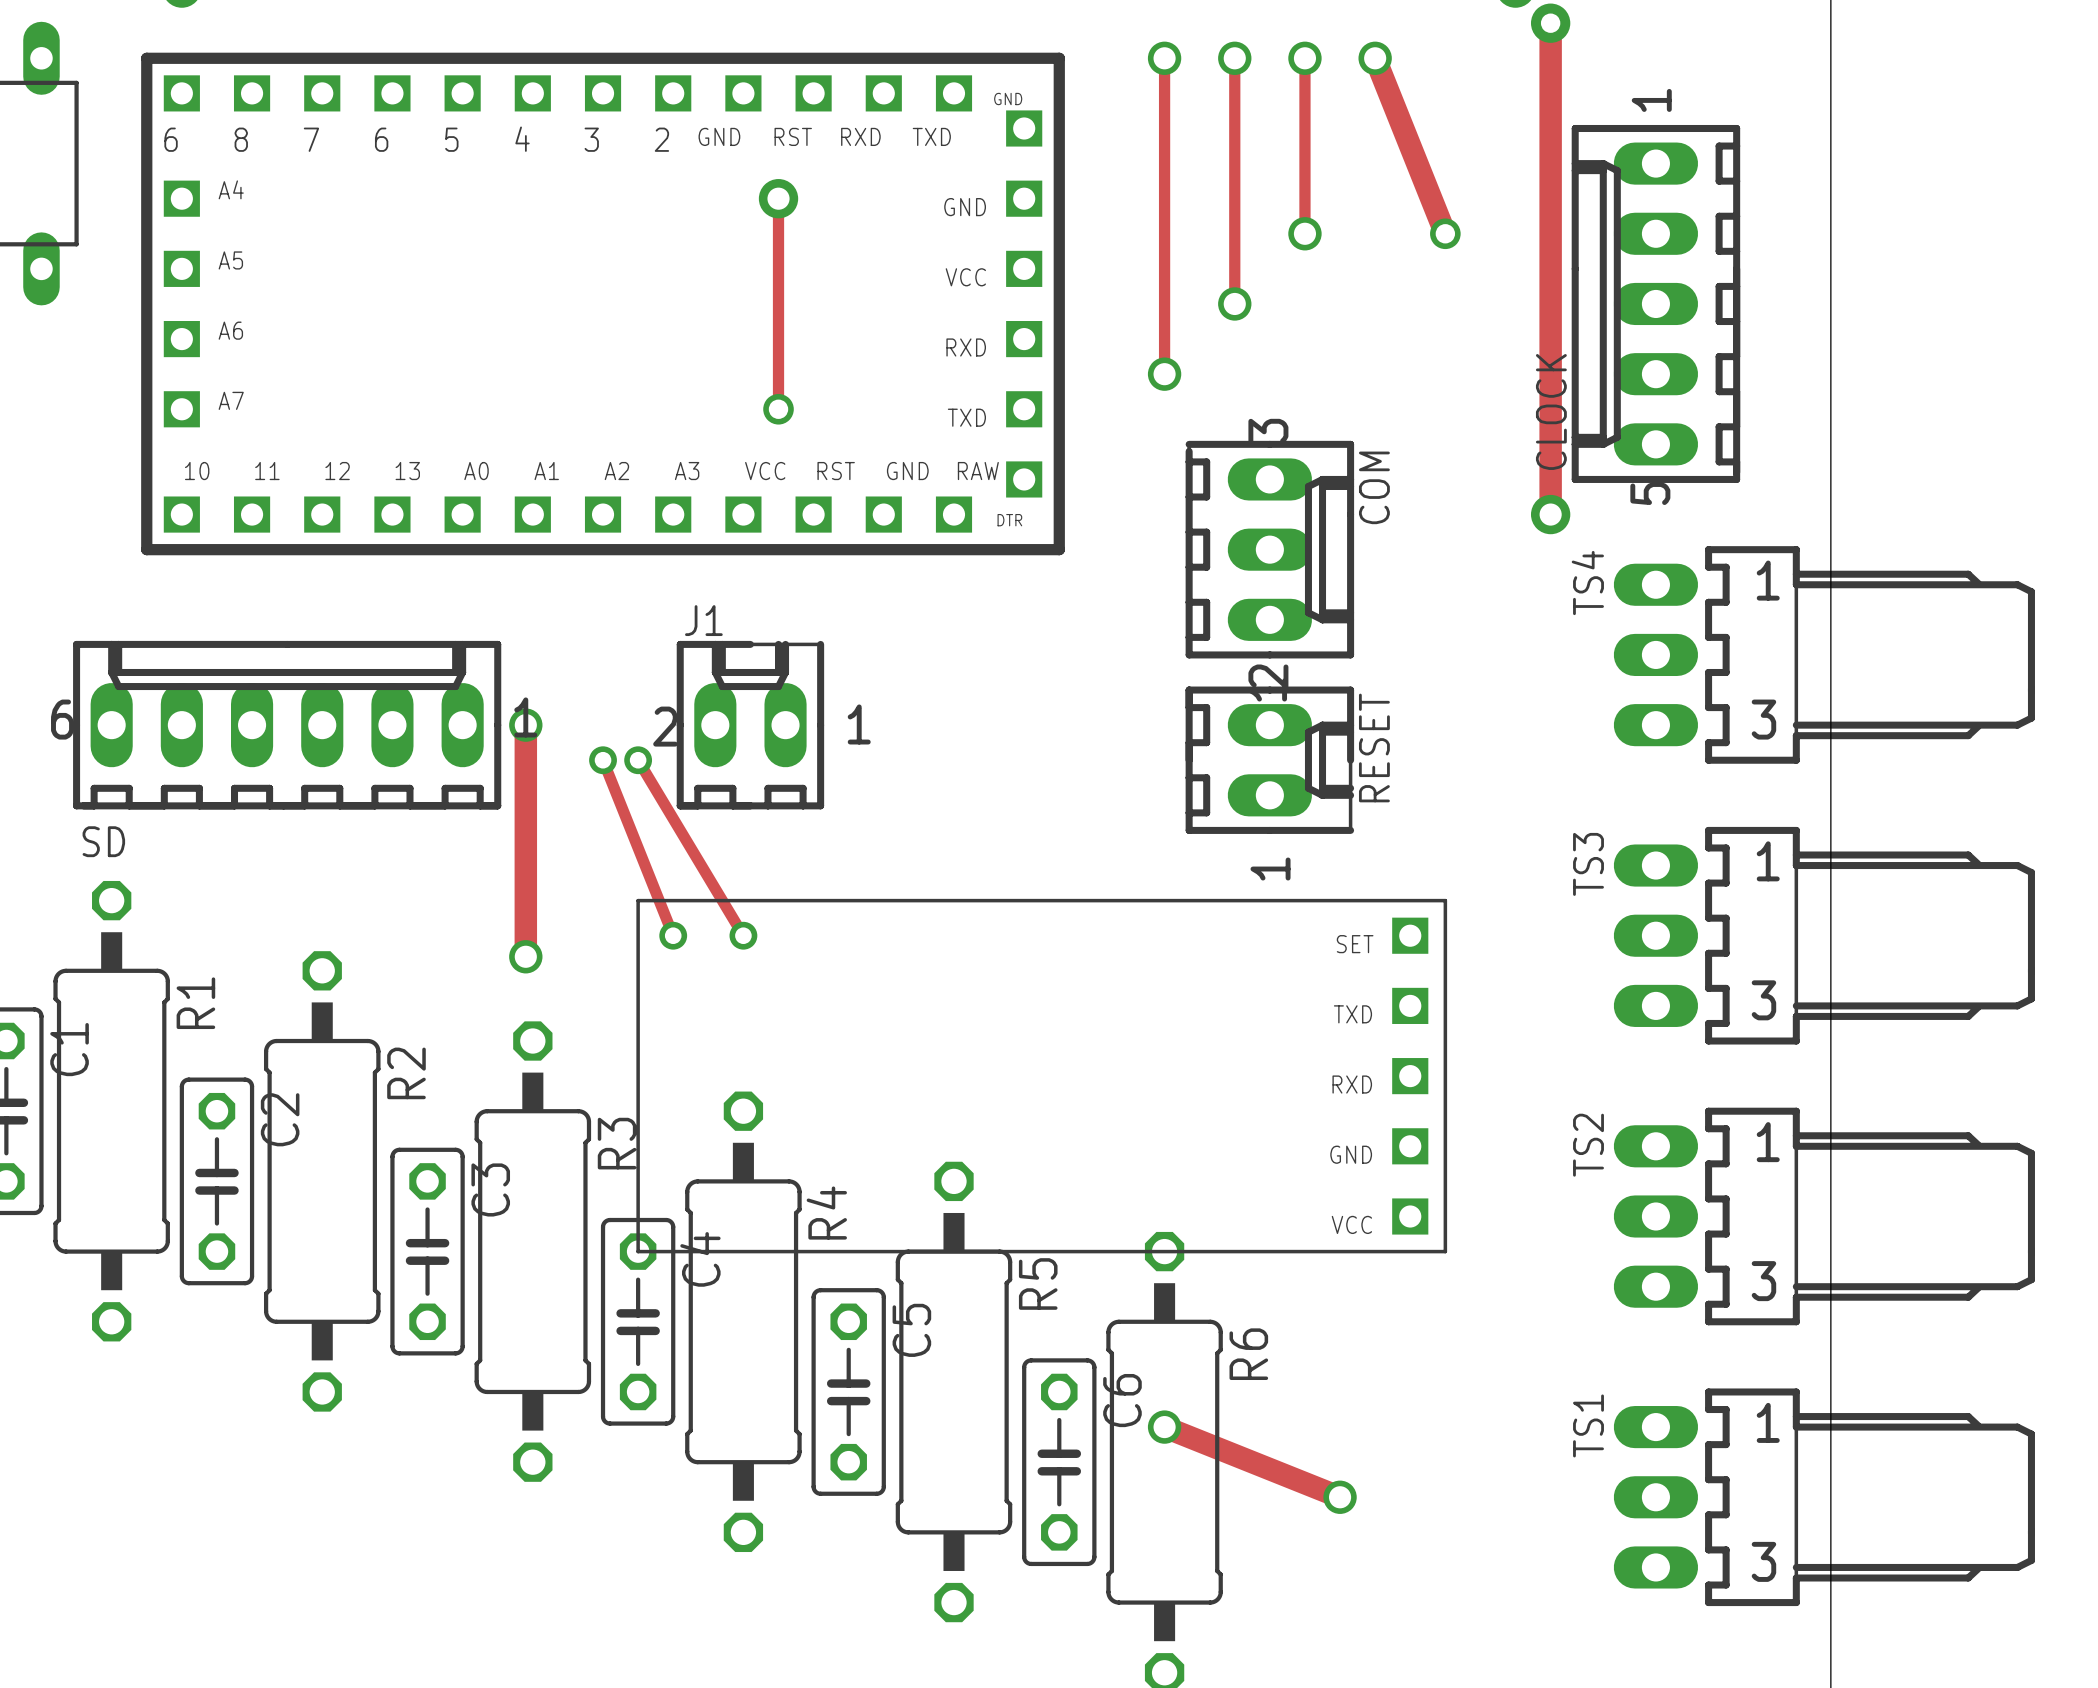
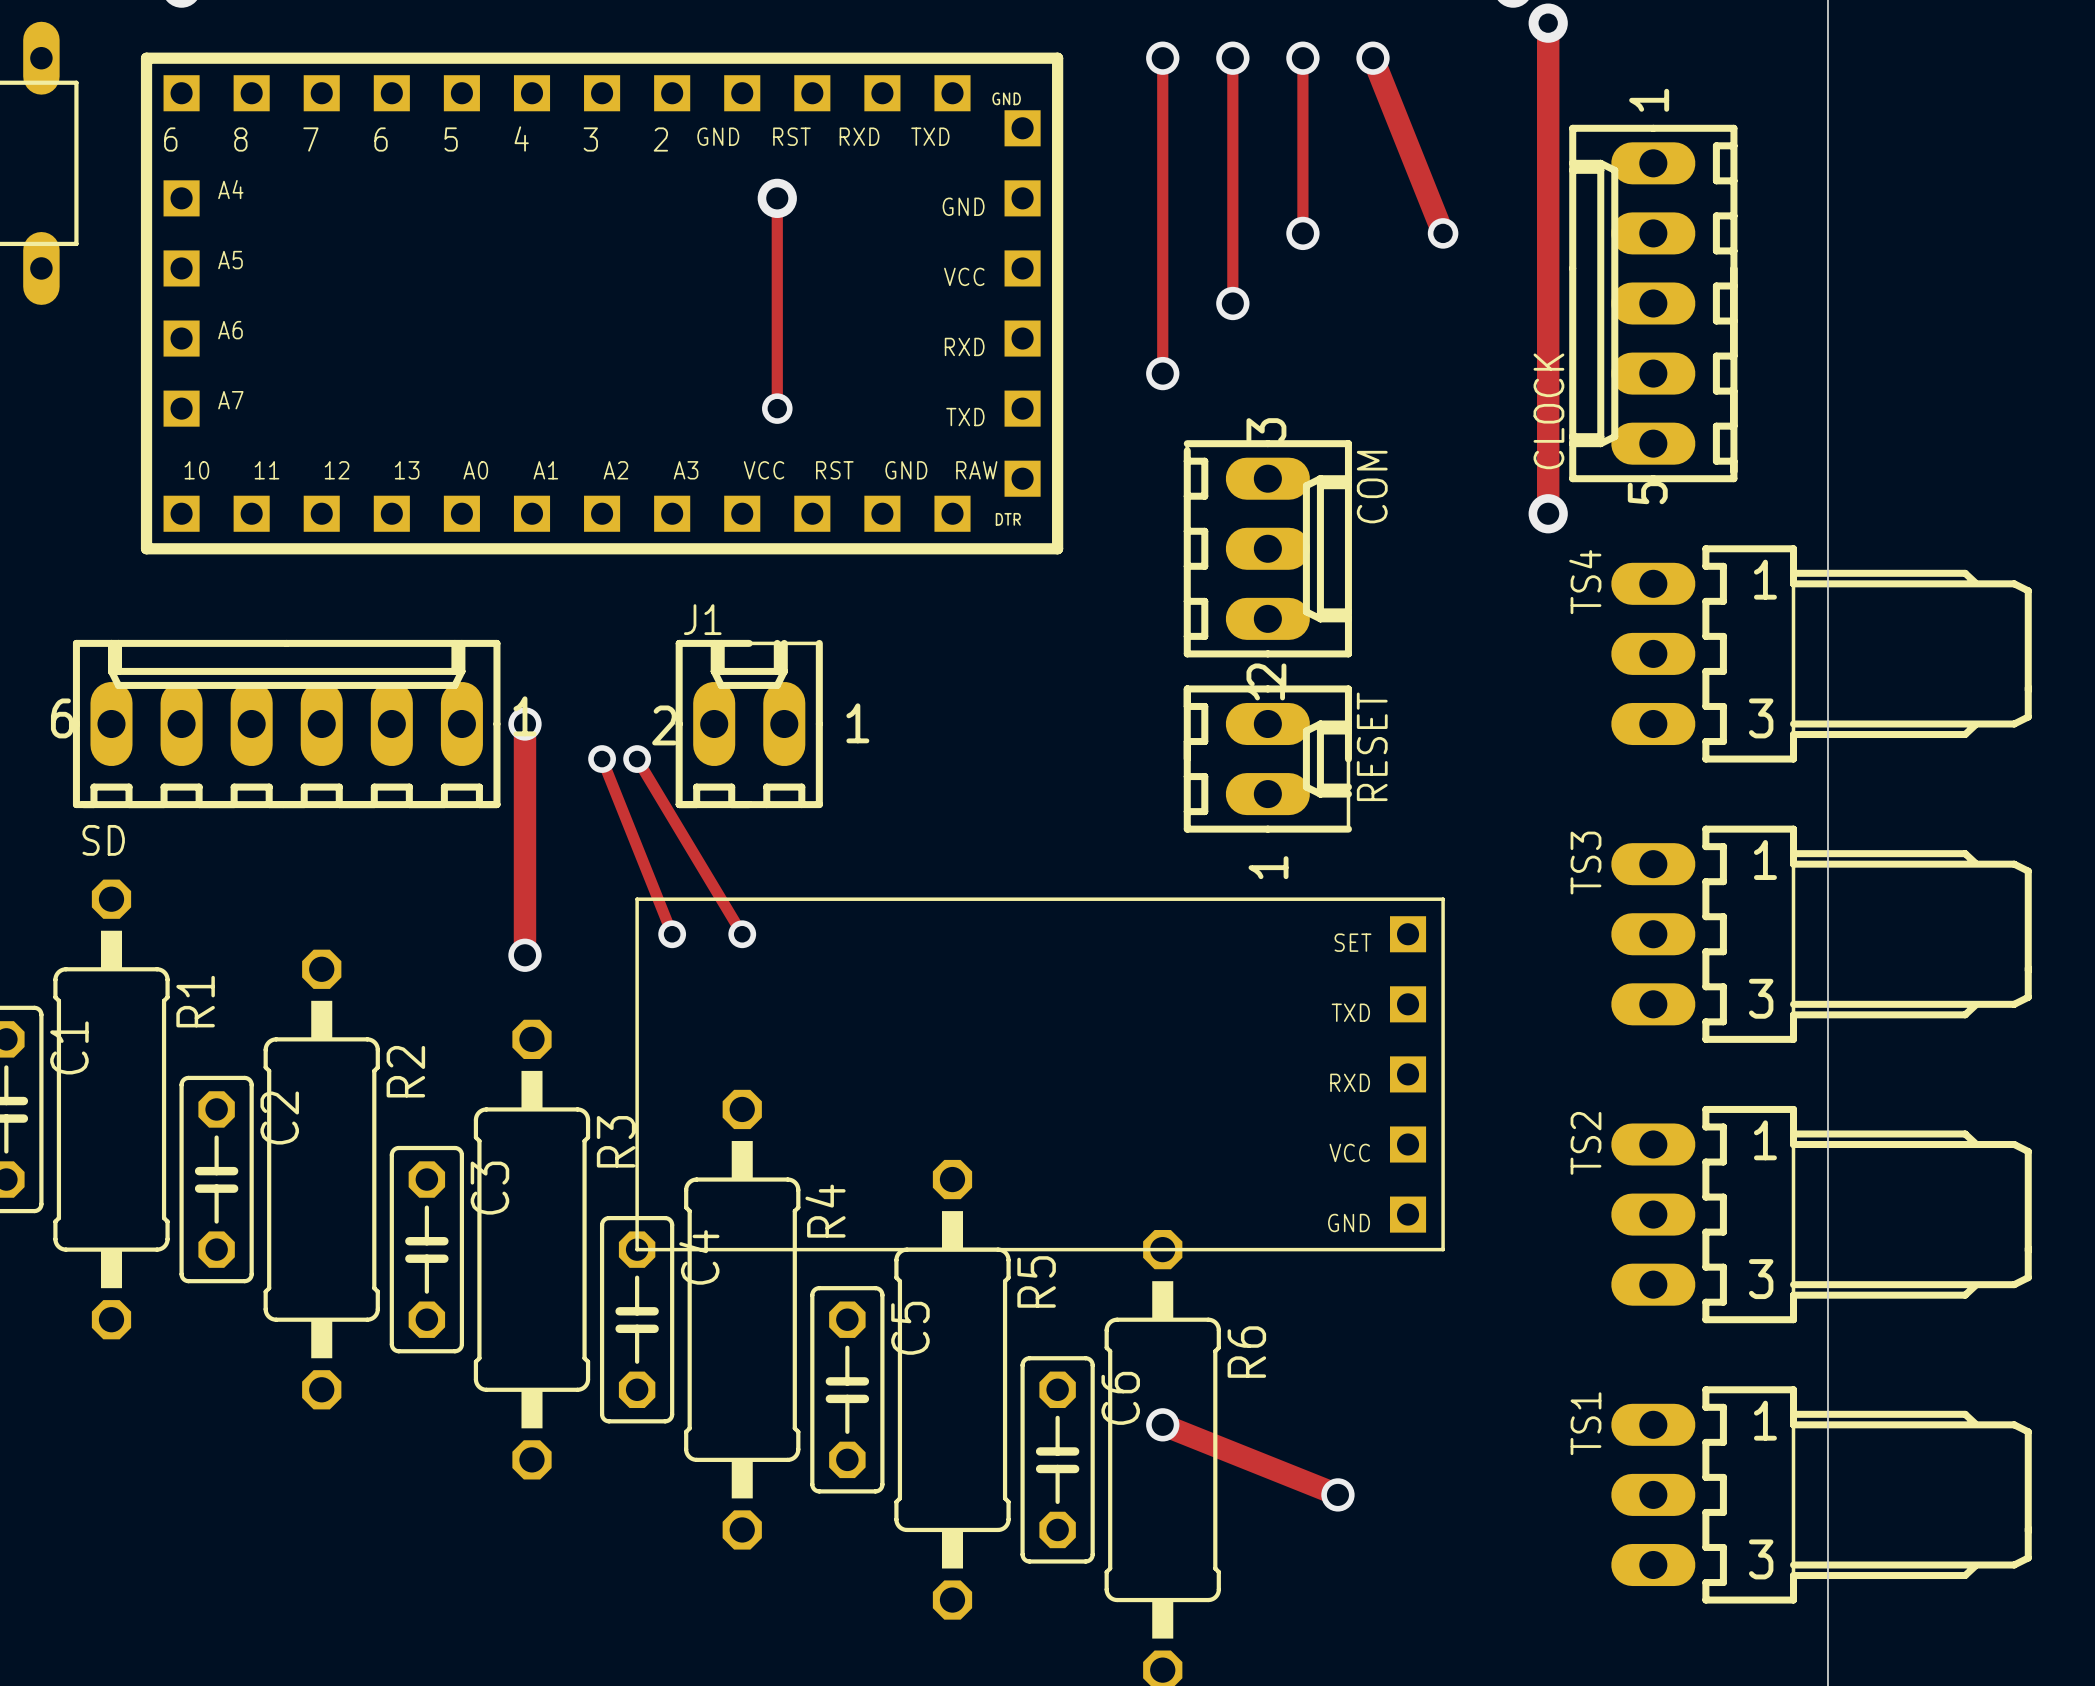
part text: GND (1351, 1154) -> VCC (1349, 1152)
part text: VCC (1351, 1224) -> GND (1349, 1222)

